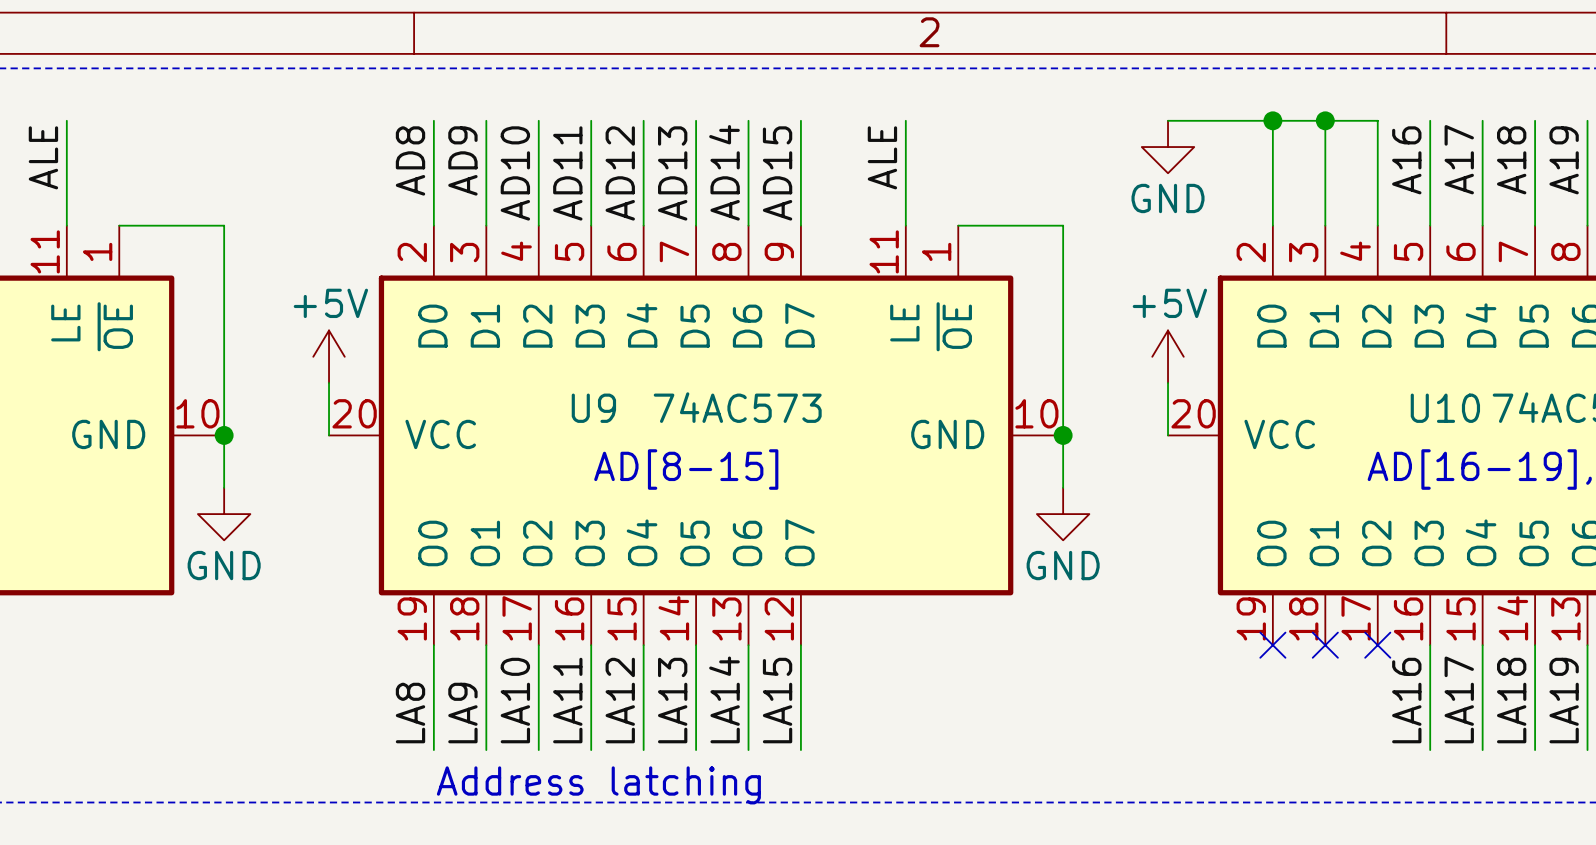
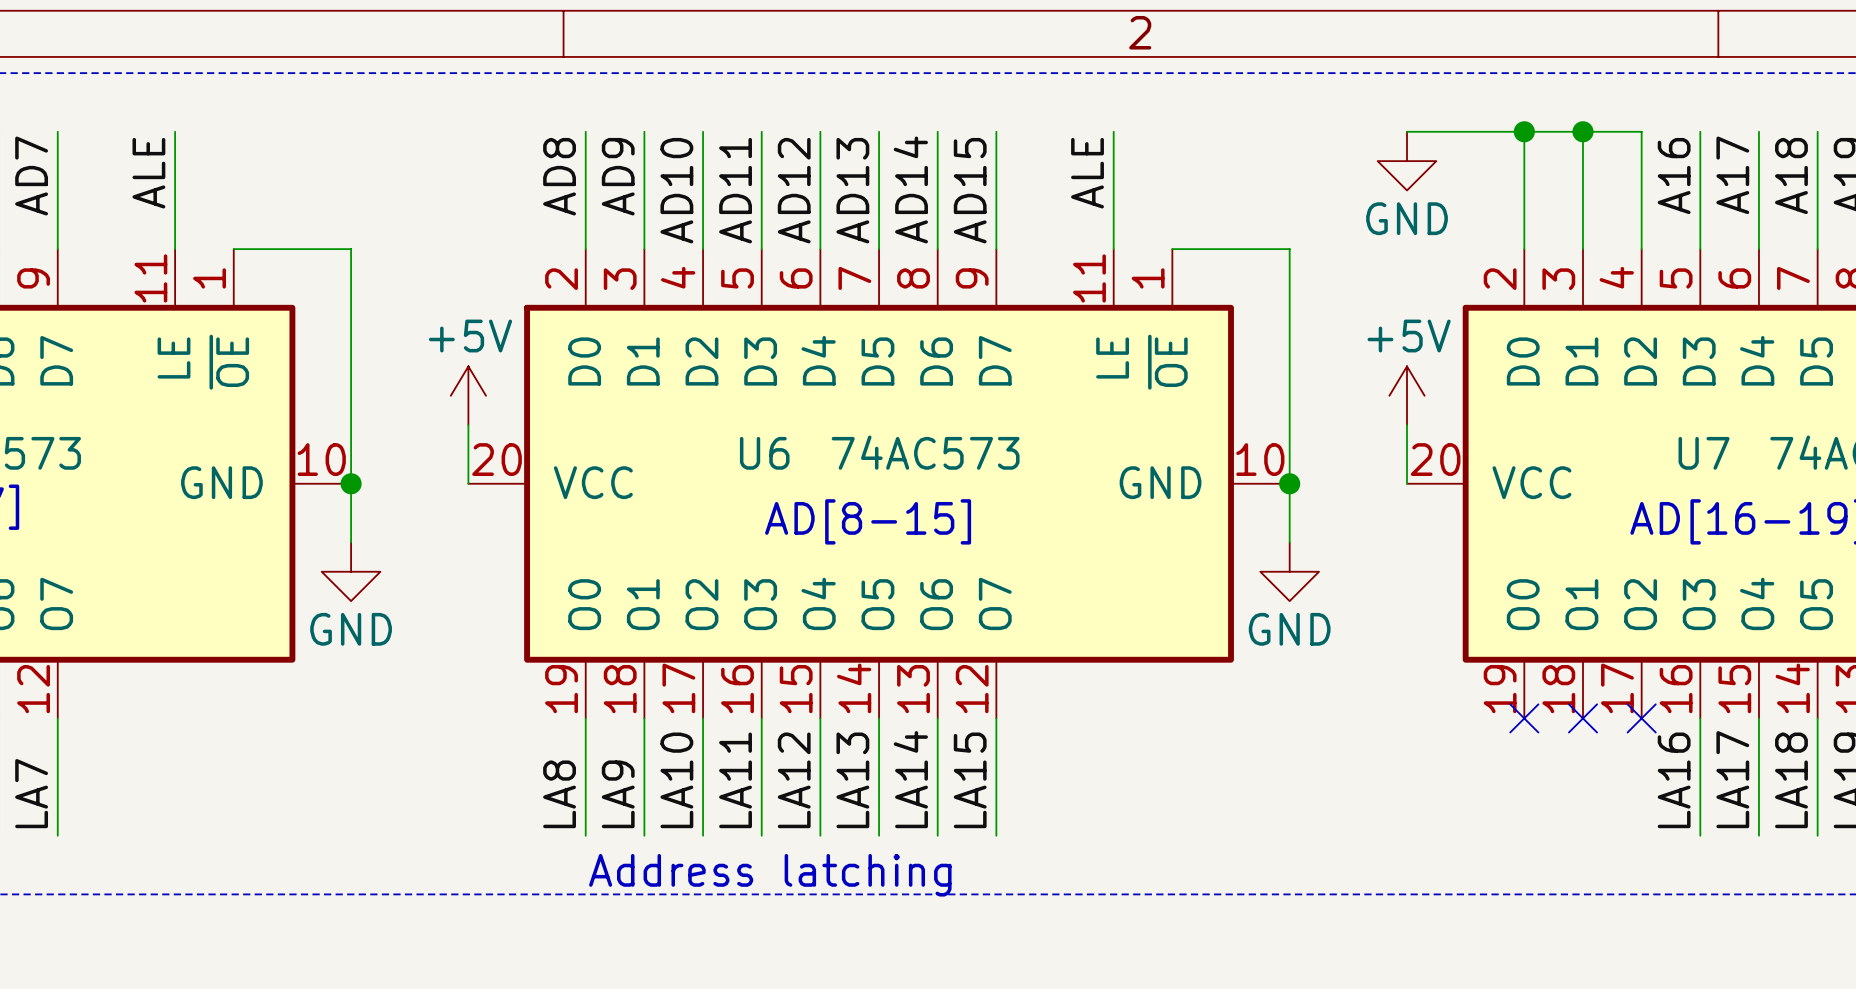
U9 name: U9 (593, 408) -> U6 (764, 453)
U10 name: U10 (1445, 408) -> U7 (1704, 453)

